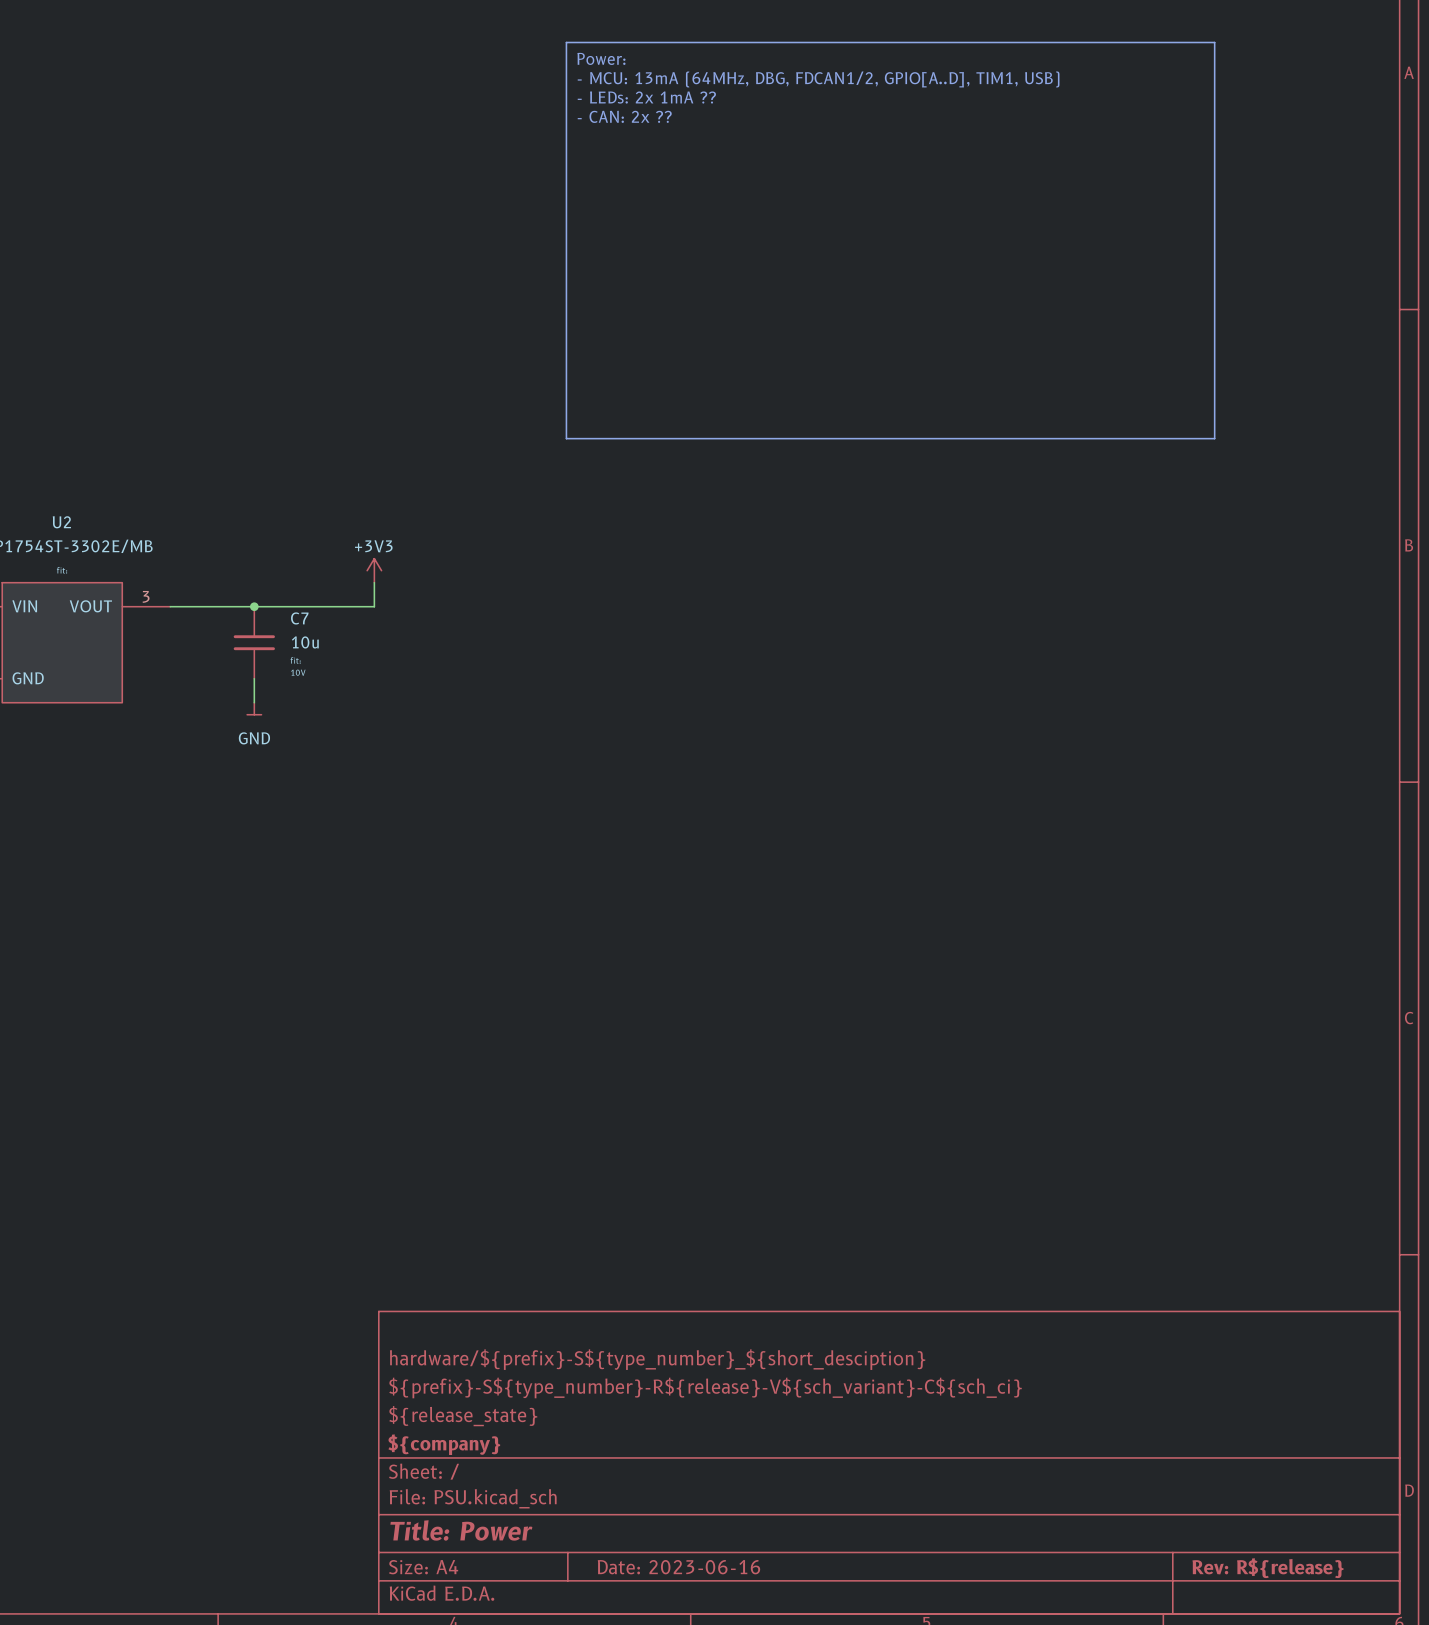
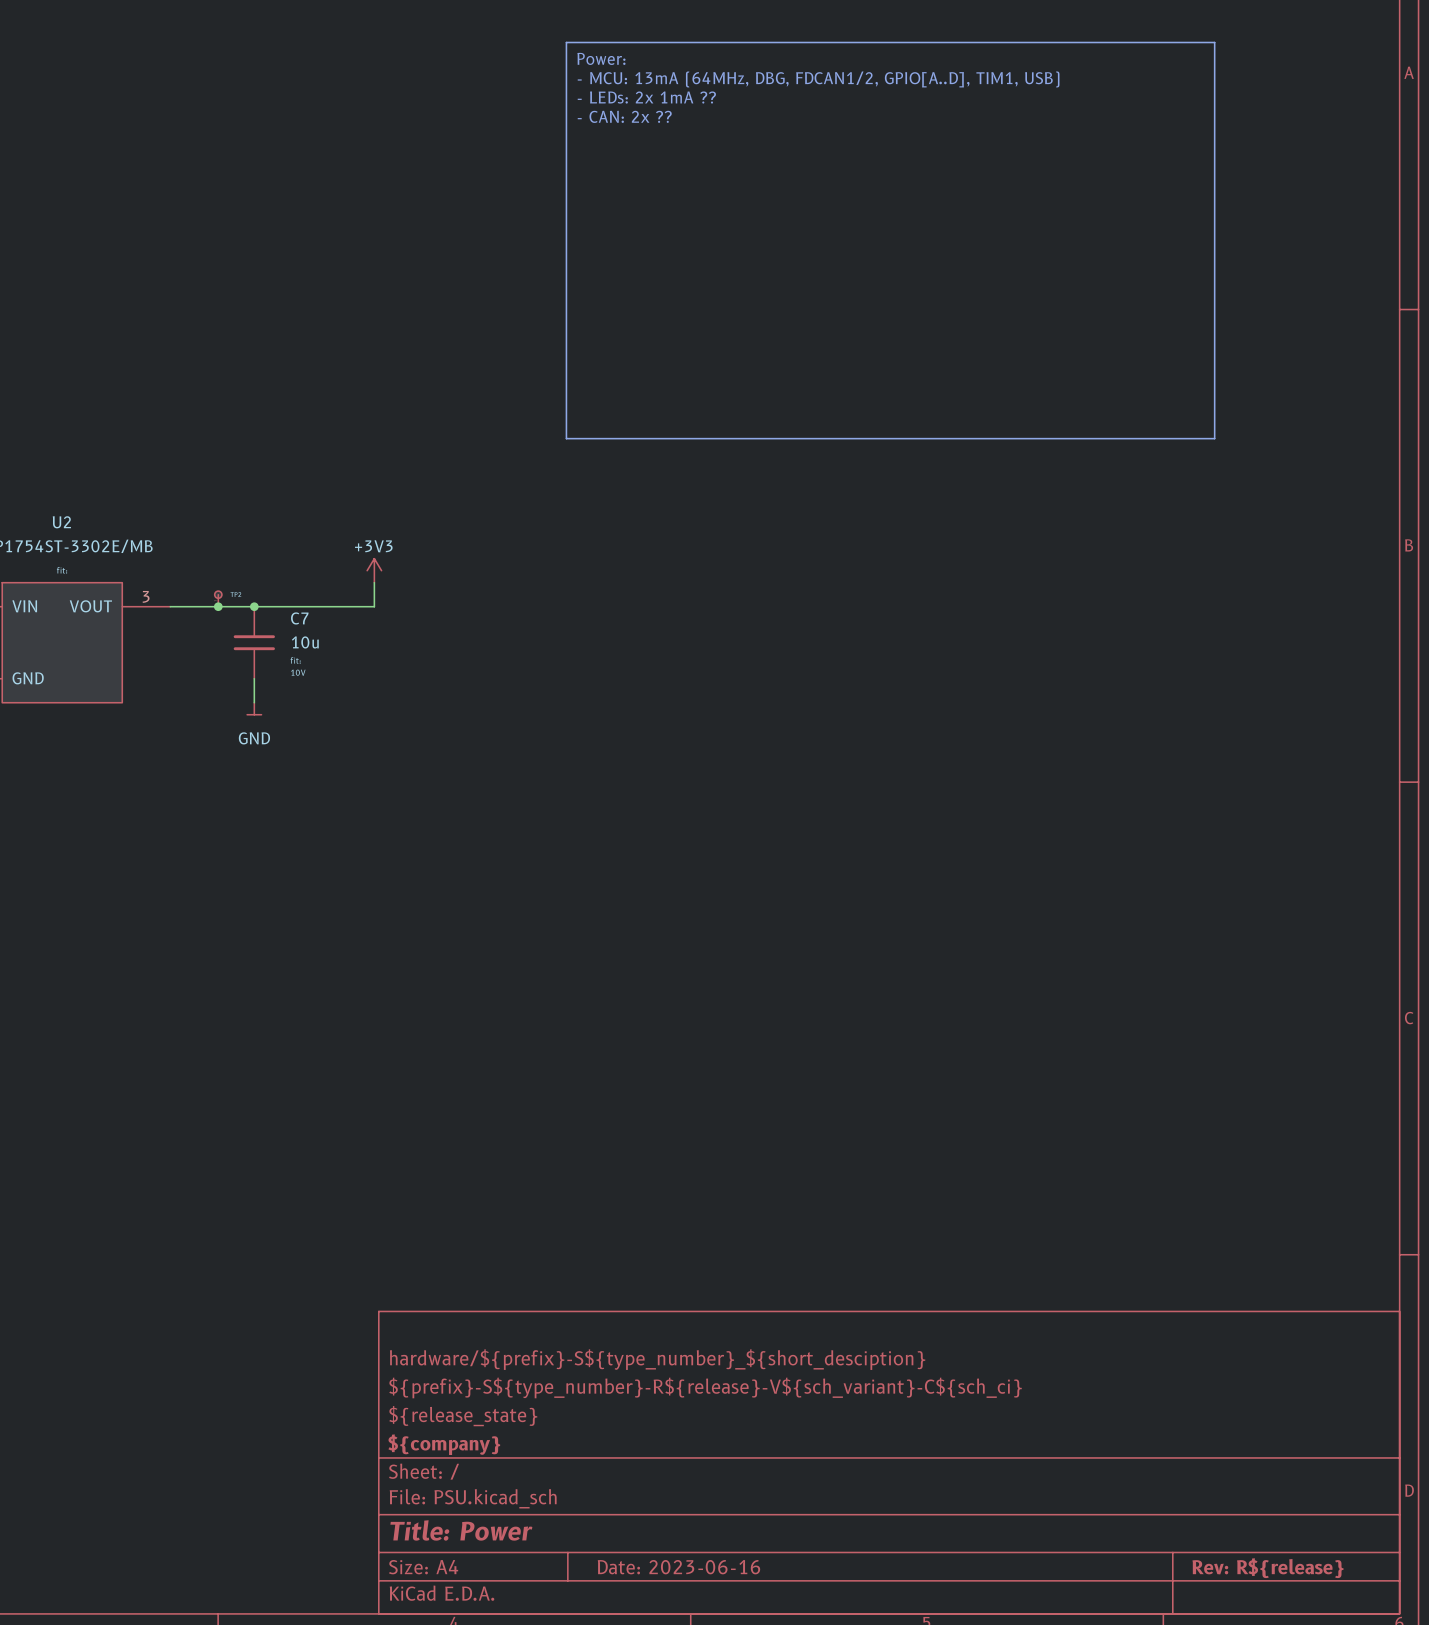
part: none -> (218, 598)
junction: none -> (218, 606)

